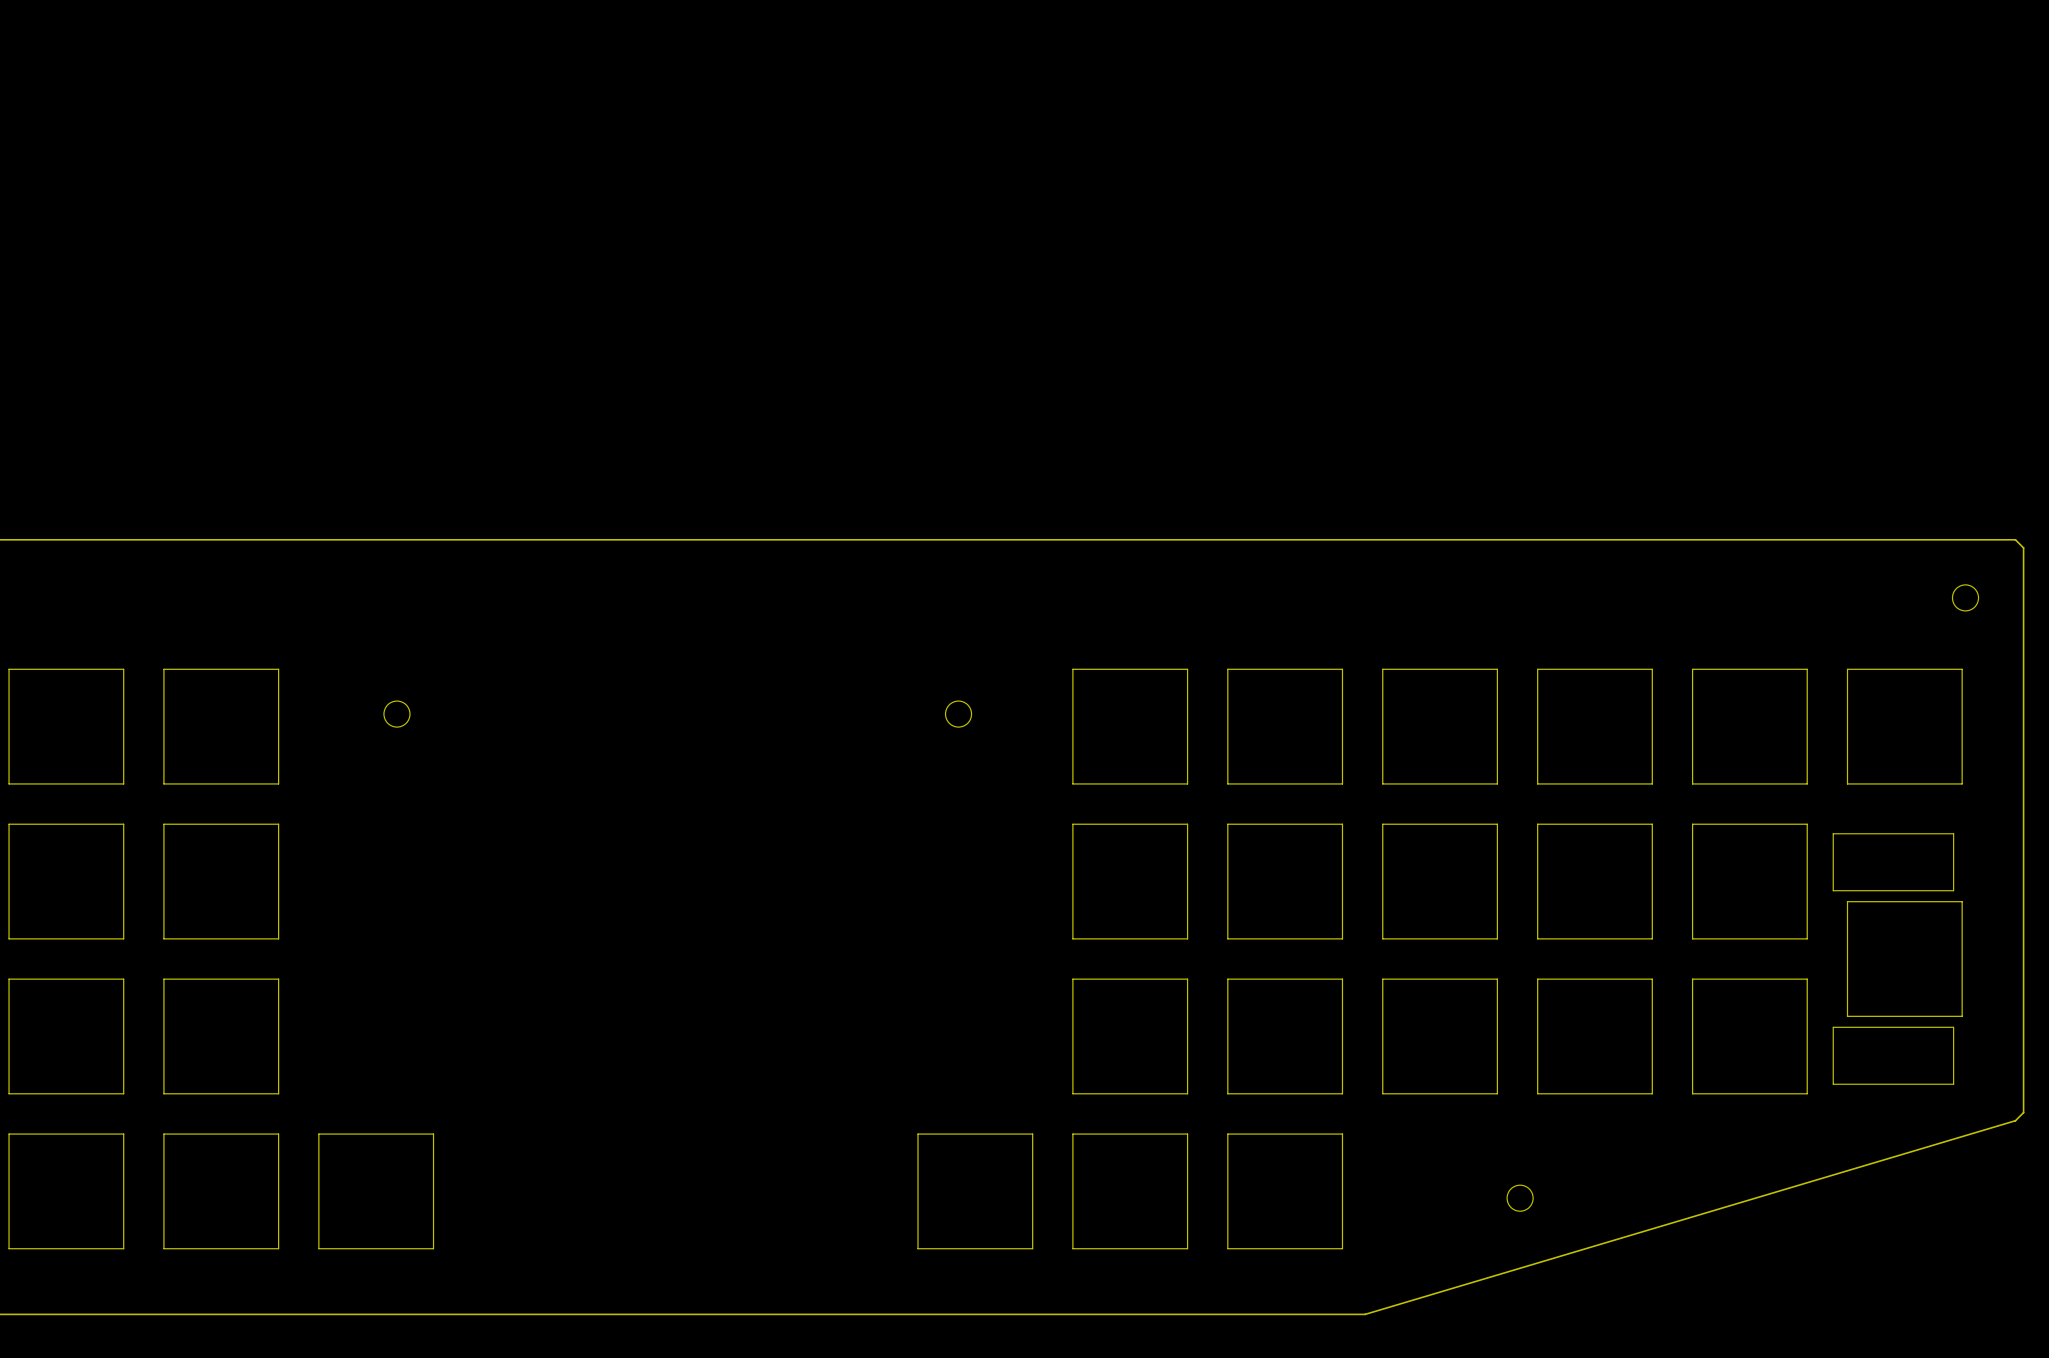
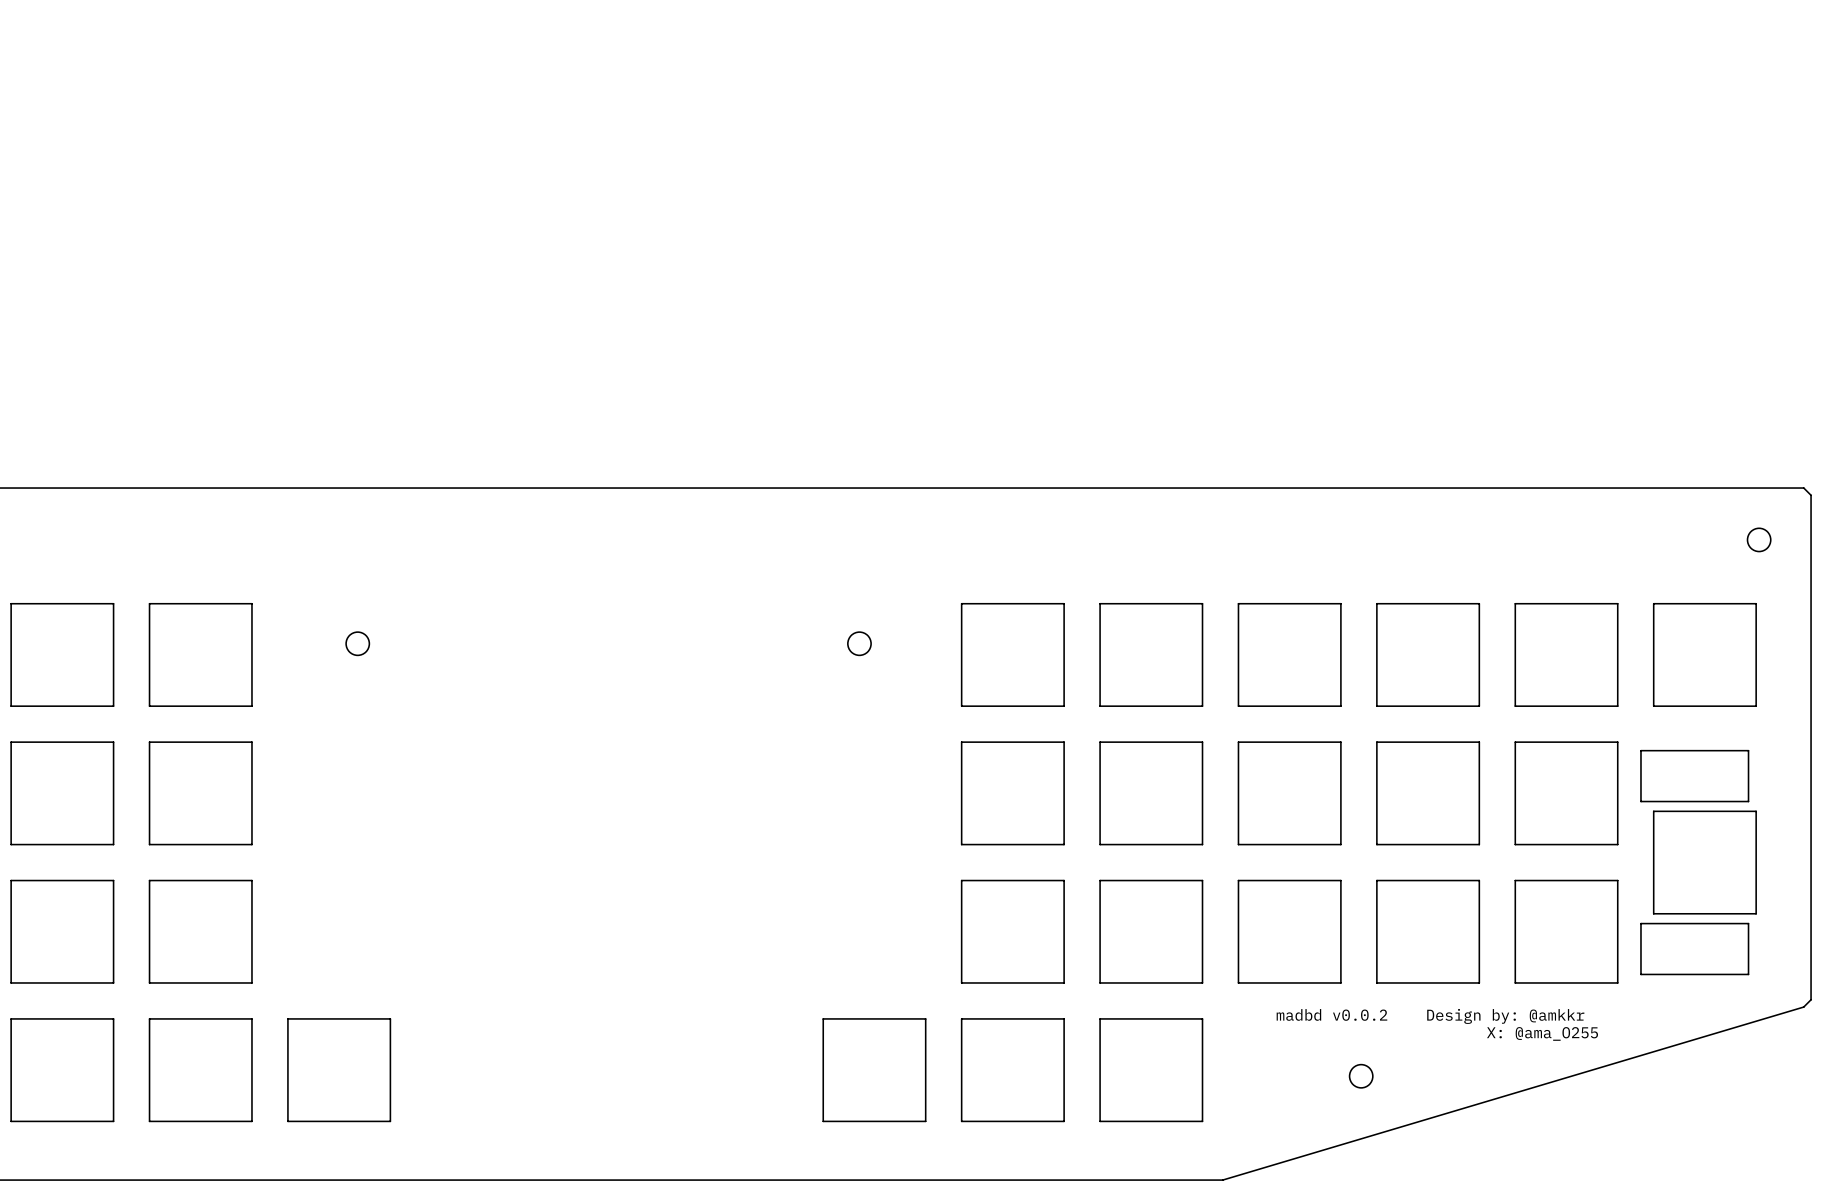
text: none -> madbd v0.0.2 Design by: @amkkr (1430, 1016)
text: none -> X: @ama_O255 (1542, 1033)

